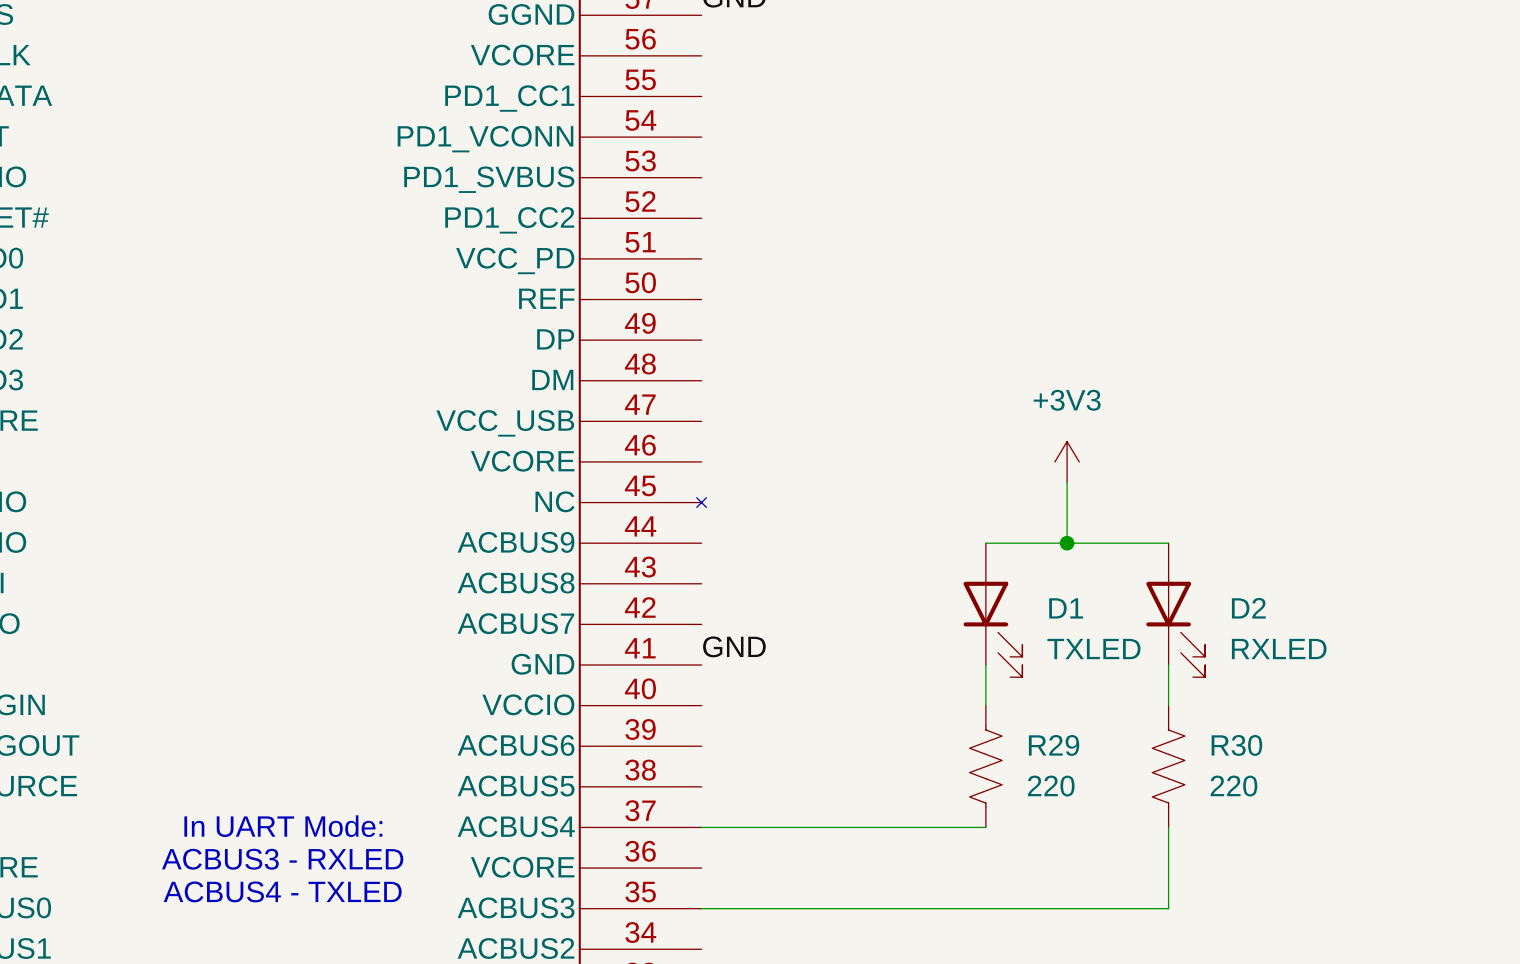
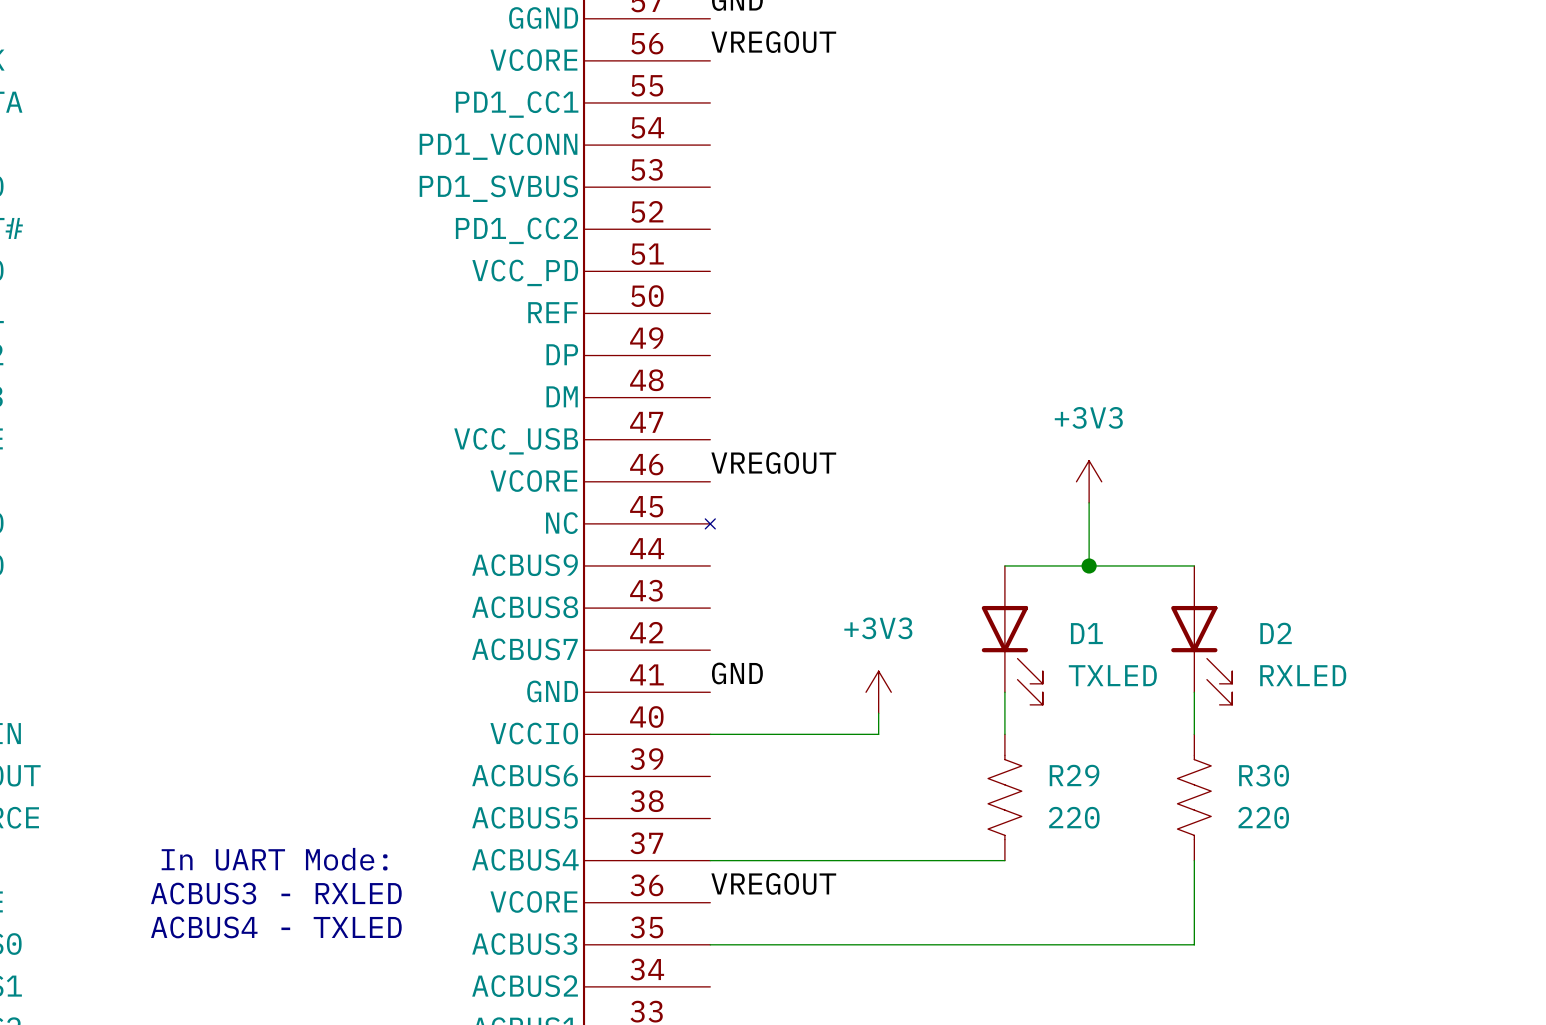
label: none -> VREGOUT (773, 42)
label: none -> VREGOUT (773, 463)
power symbol: none -> +3V3 (878, 692)
wire: none -> (878, 713) (878, 734) (710, 734)
label: none -> VREGOUT (773, 883)

